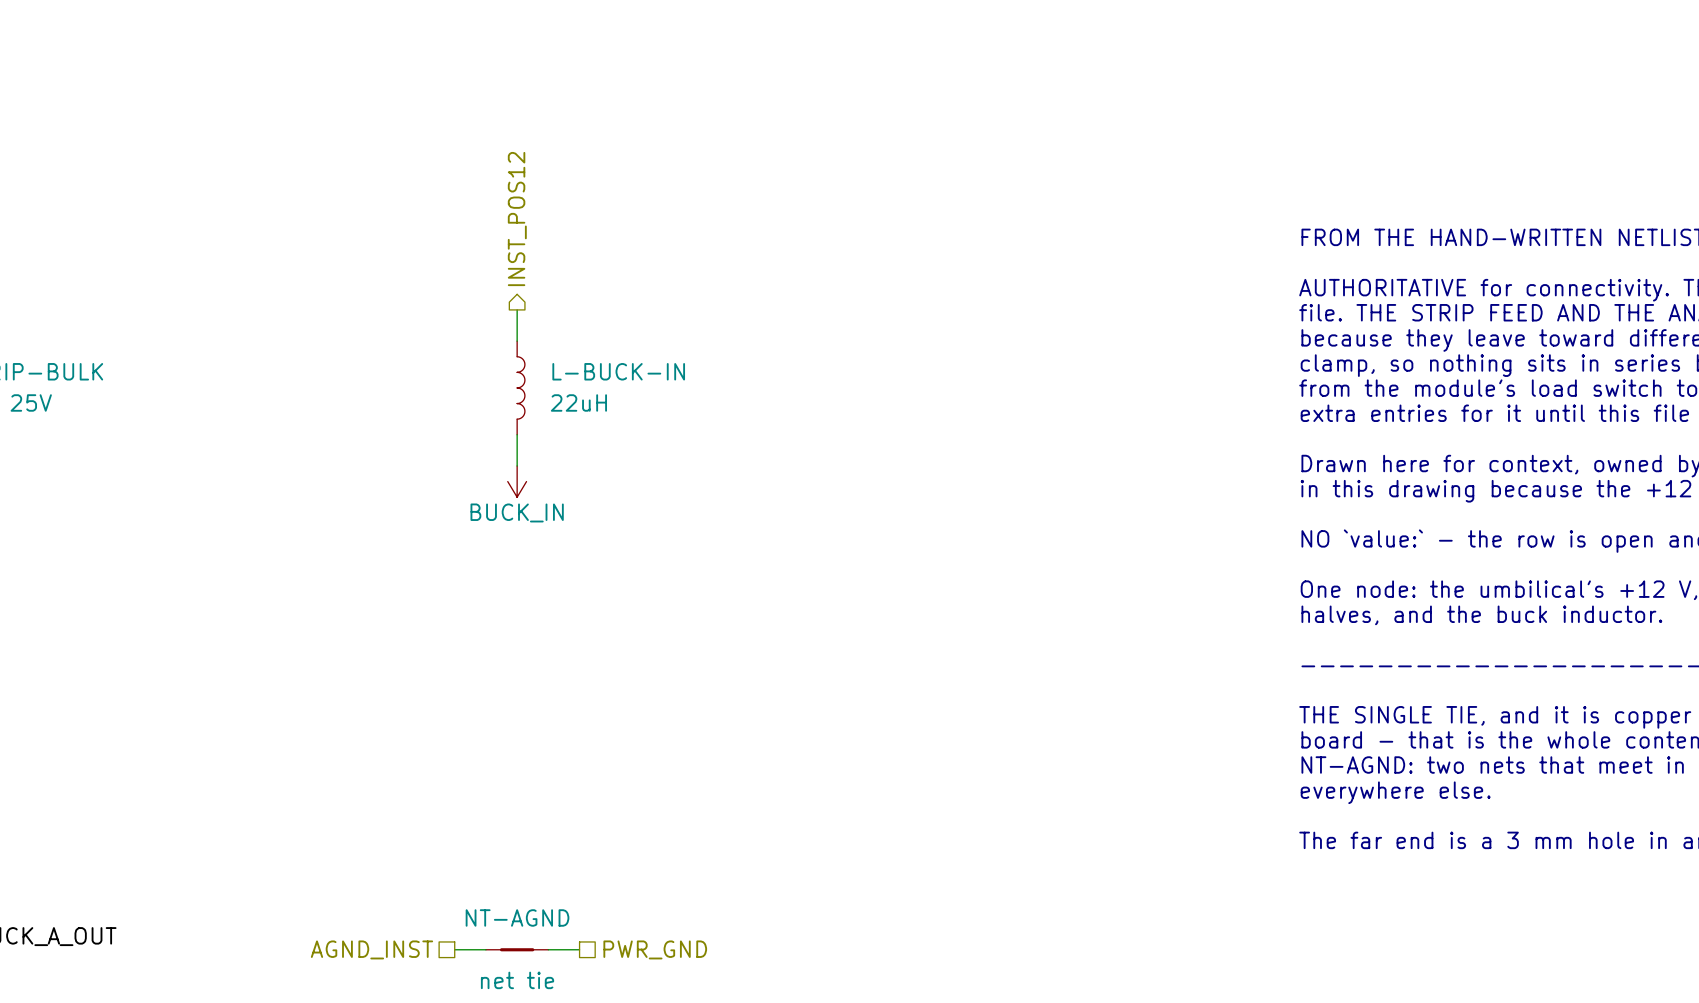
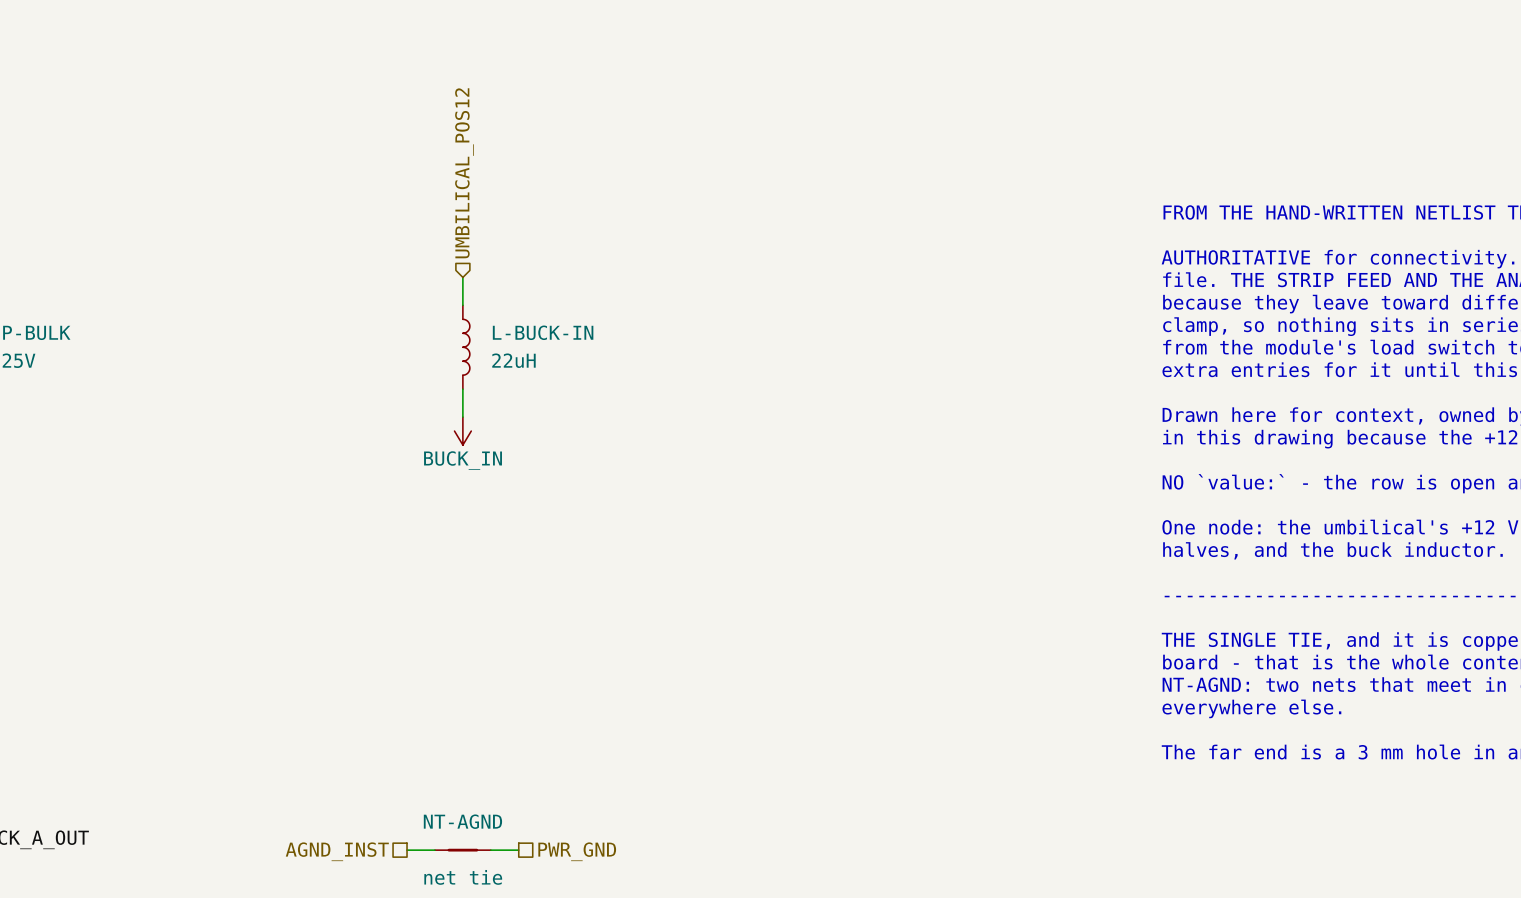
hierarchical label shape: output (517, 219) -> input (464, 173)
hierarchical label: INST_POS12 (517, 219) -> UMBILICAL_POS12 (464, 173)

